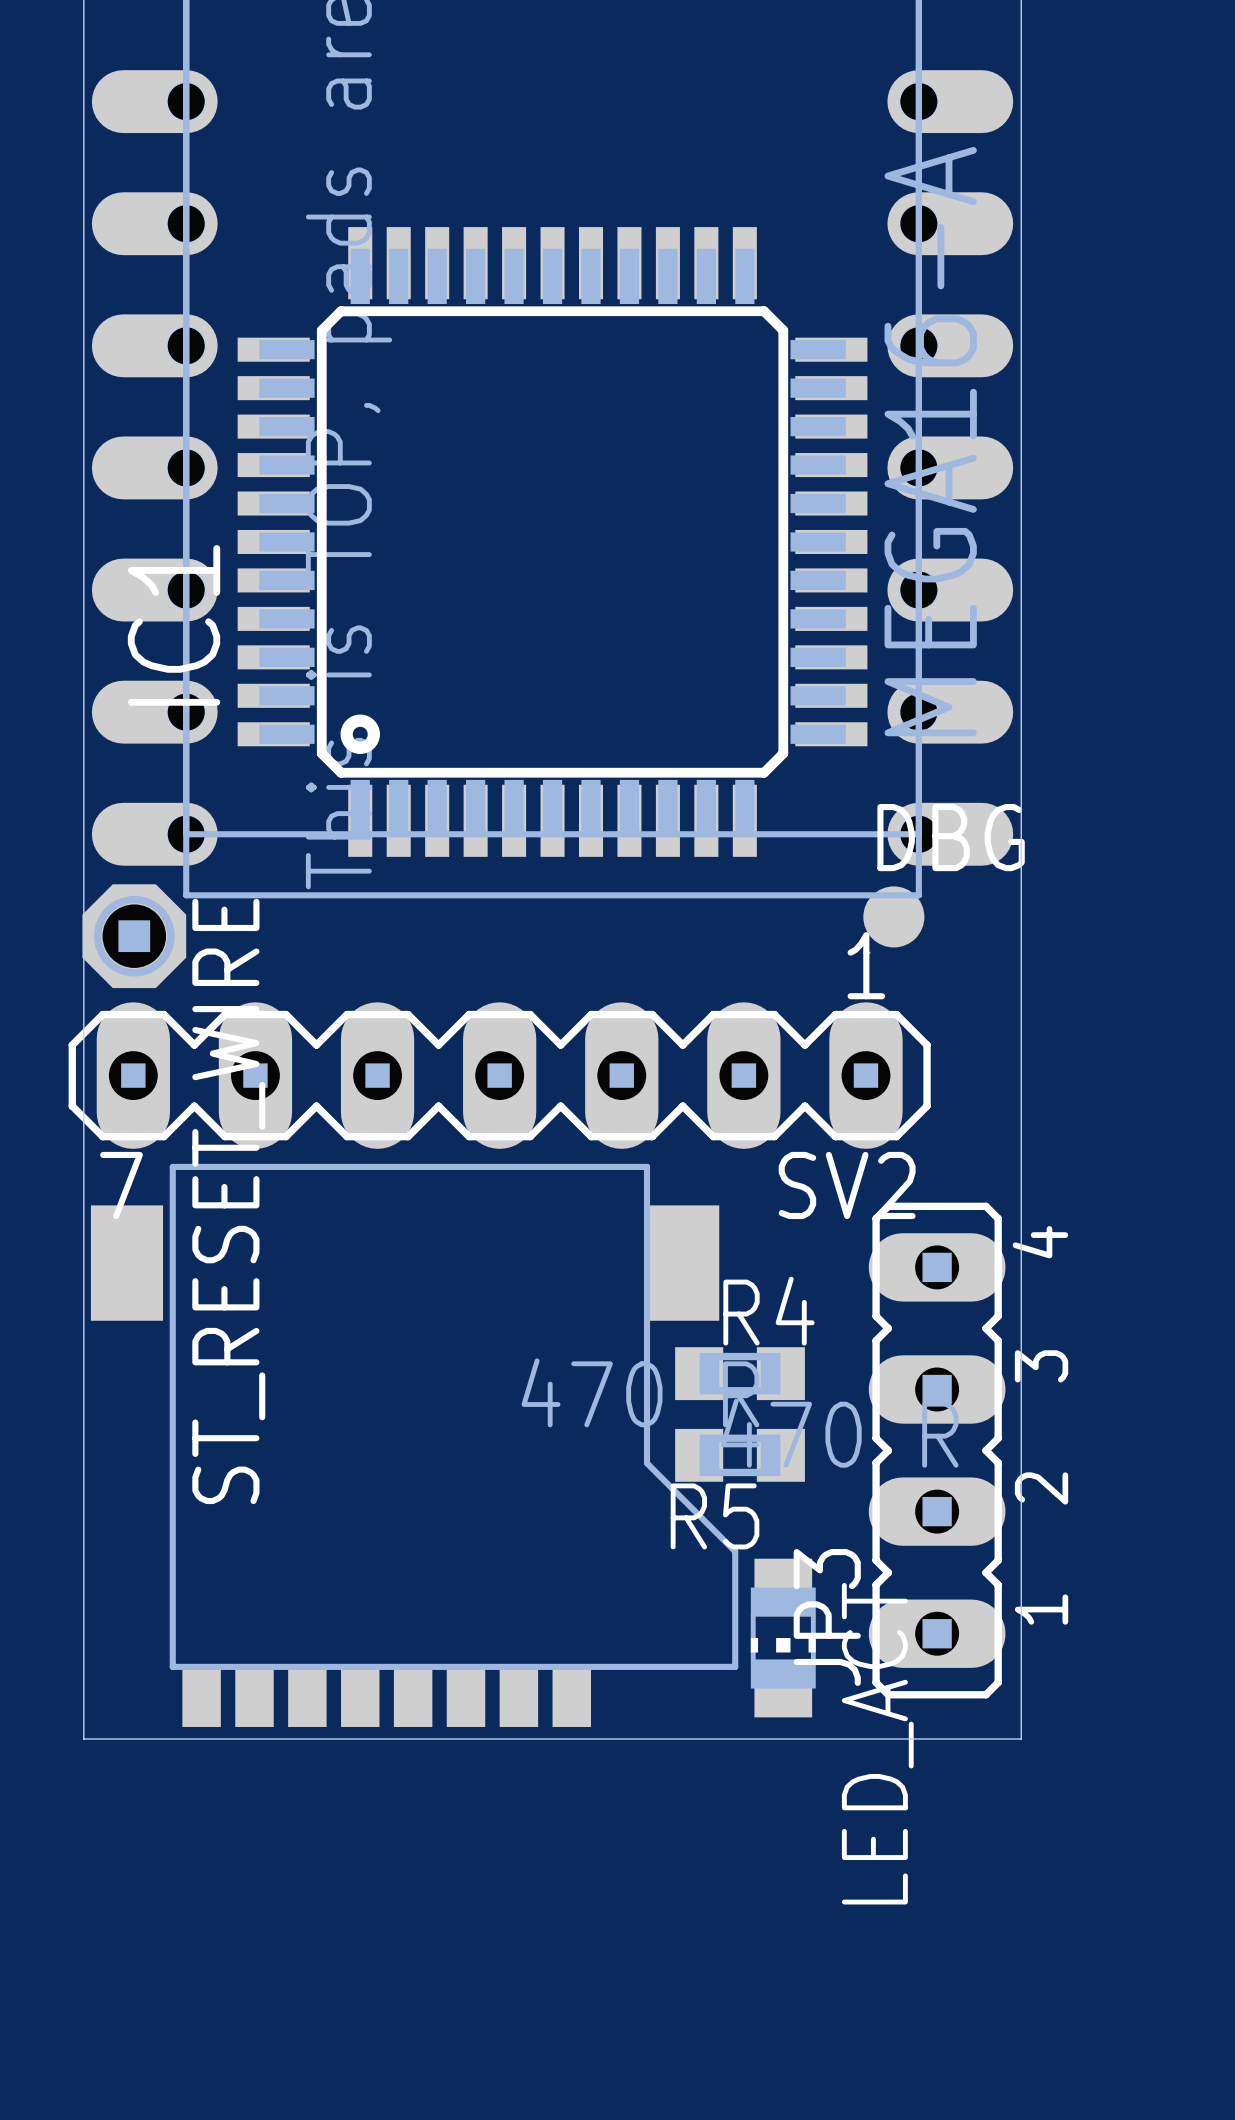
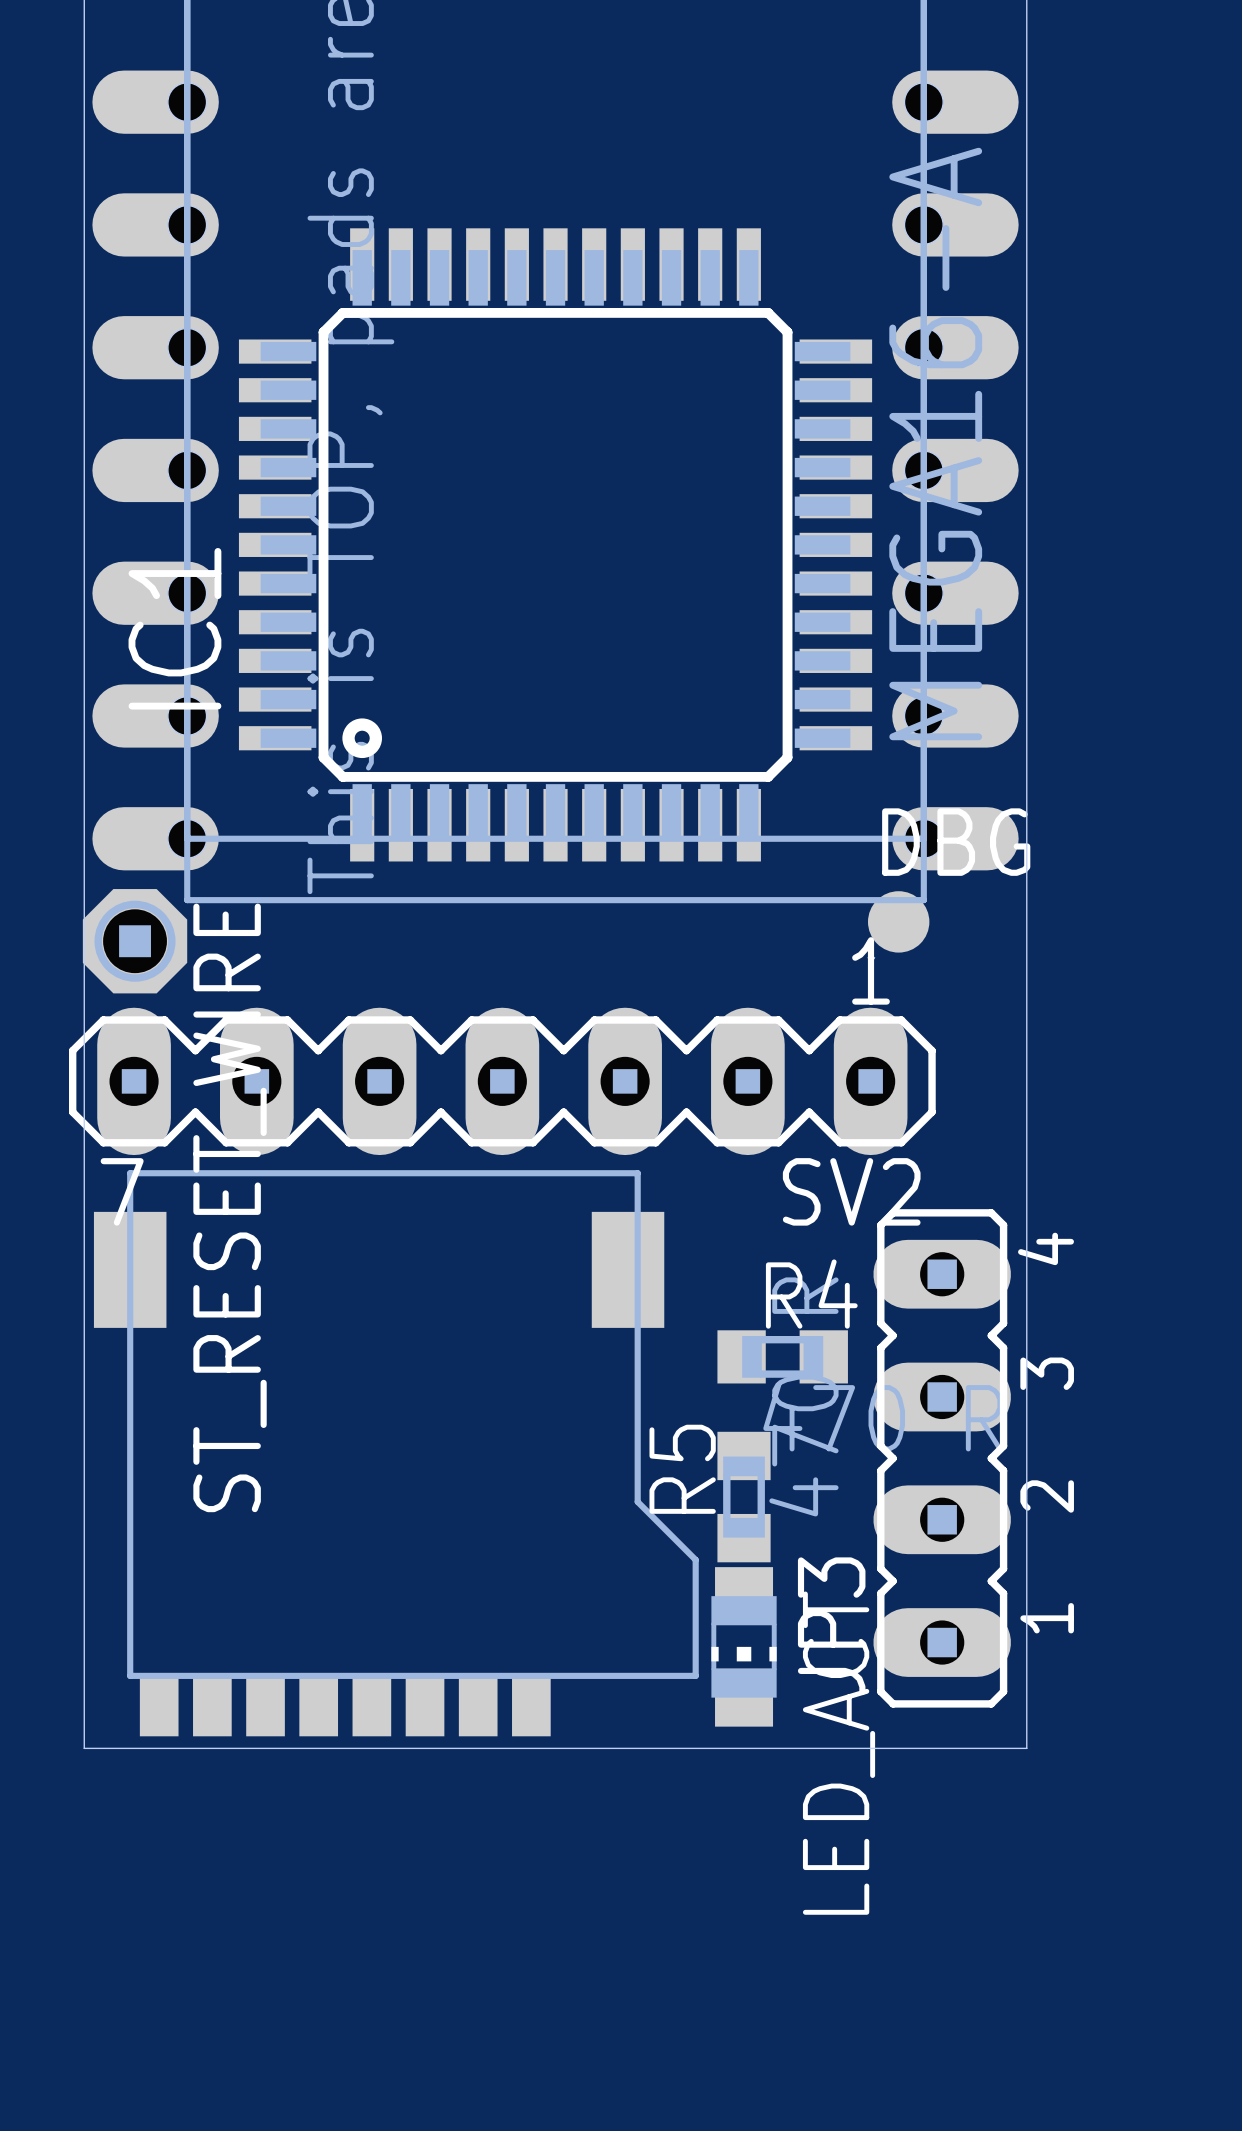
part footprint: [90, 1163, 739, 1727] -> [93, 1170, 699, 1737]
R4 position: (740, 1373) -> (782, 1356)
R5 rotation: 0° (740, 1455) -> 90° clockwise (744, 1497)
LED_ACT position: (783, 1638) -> (744, 1646)

